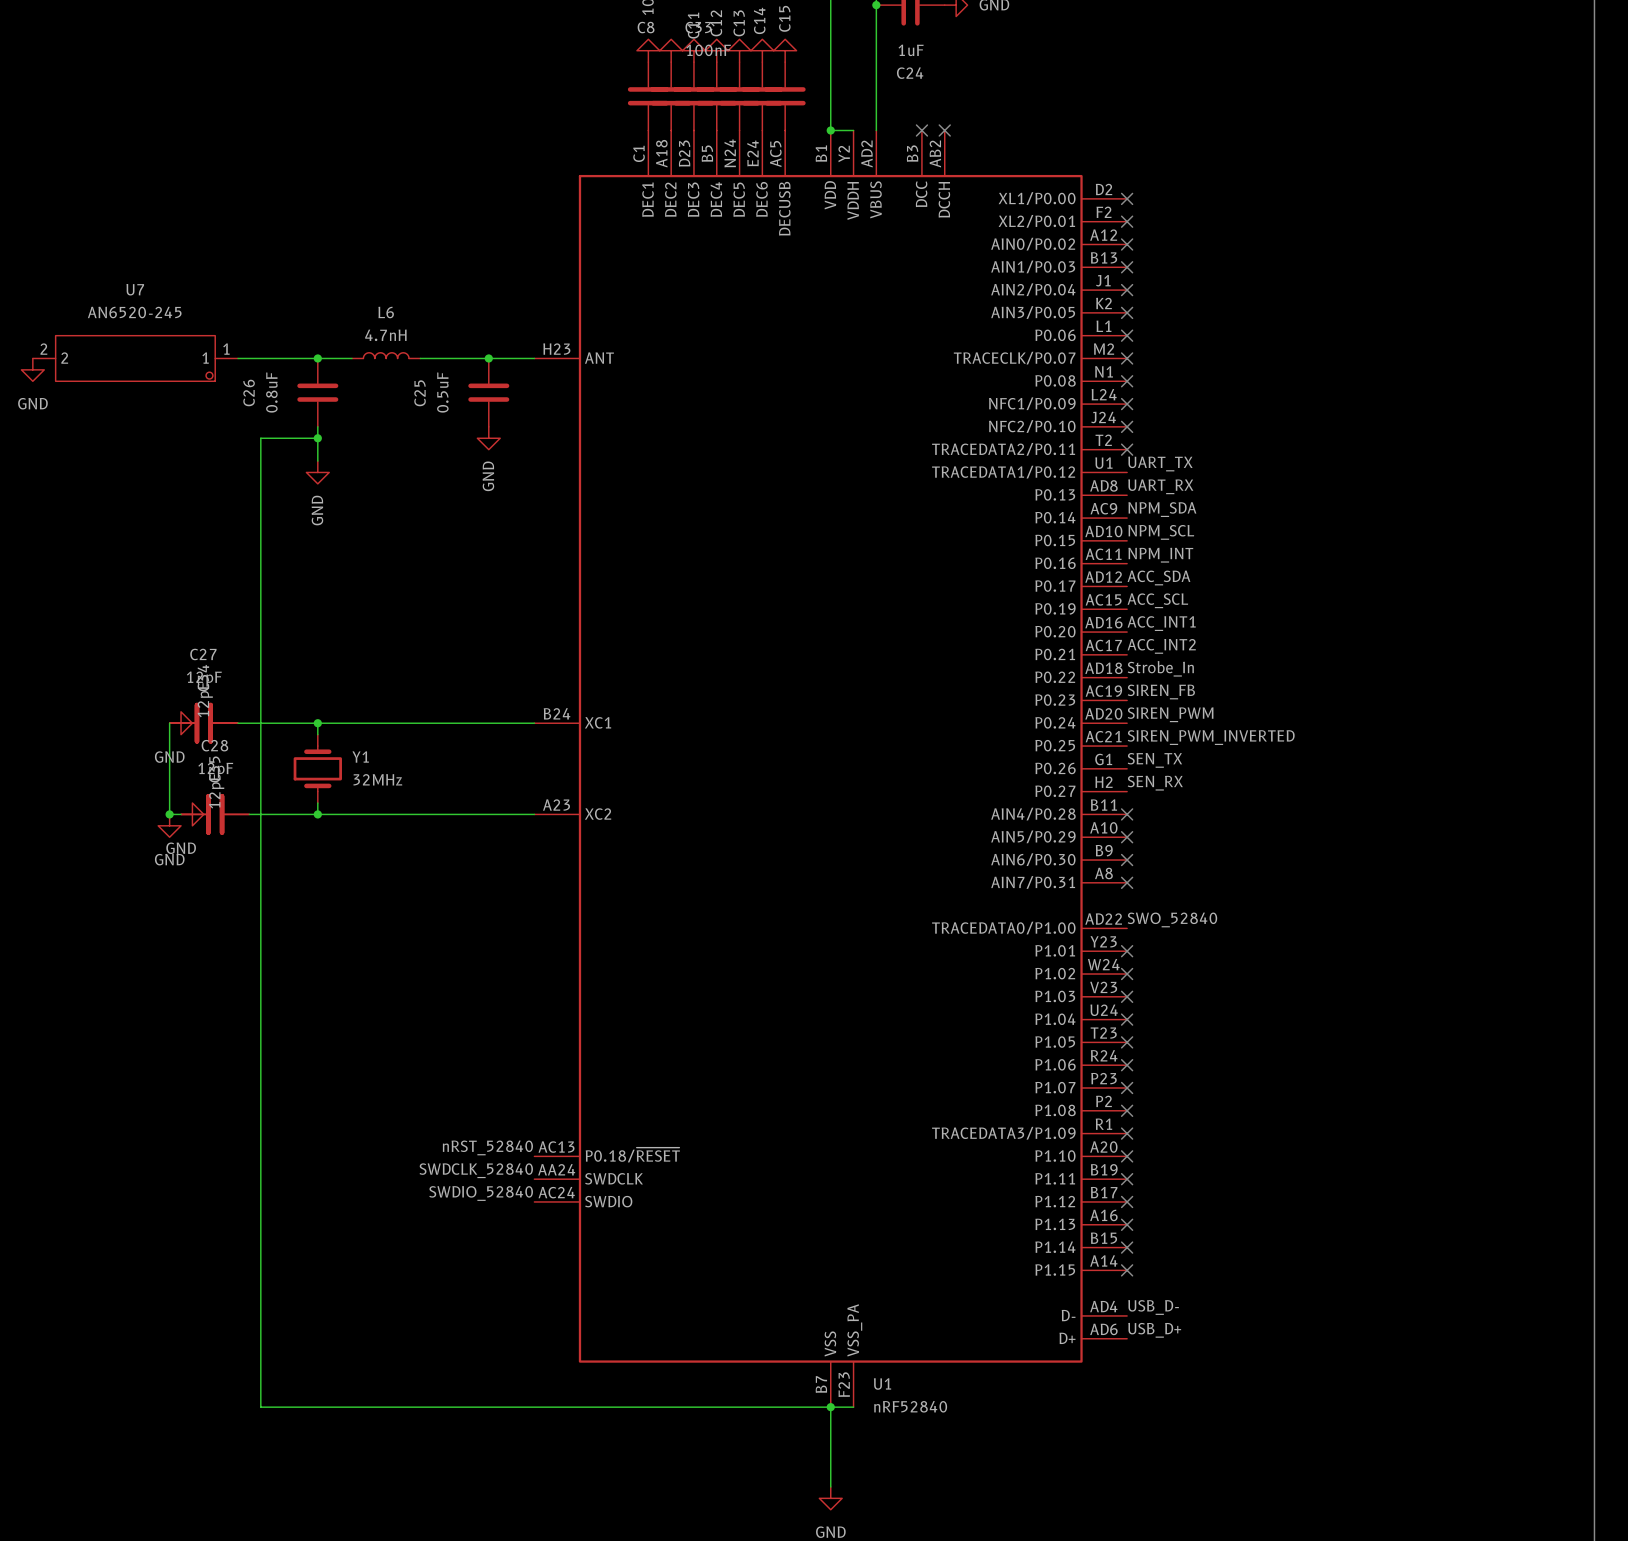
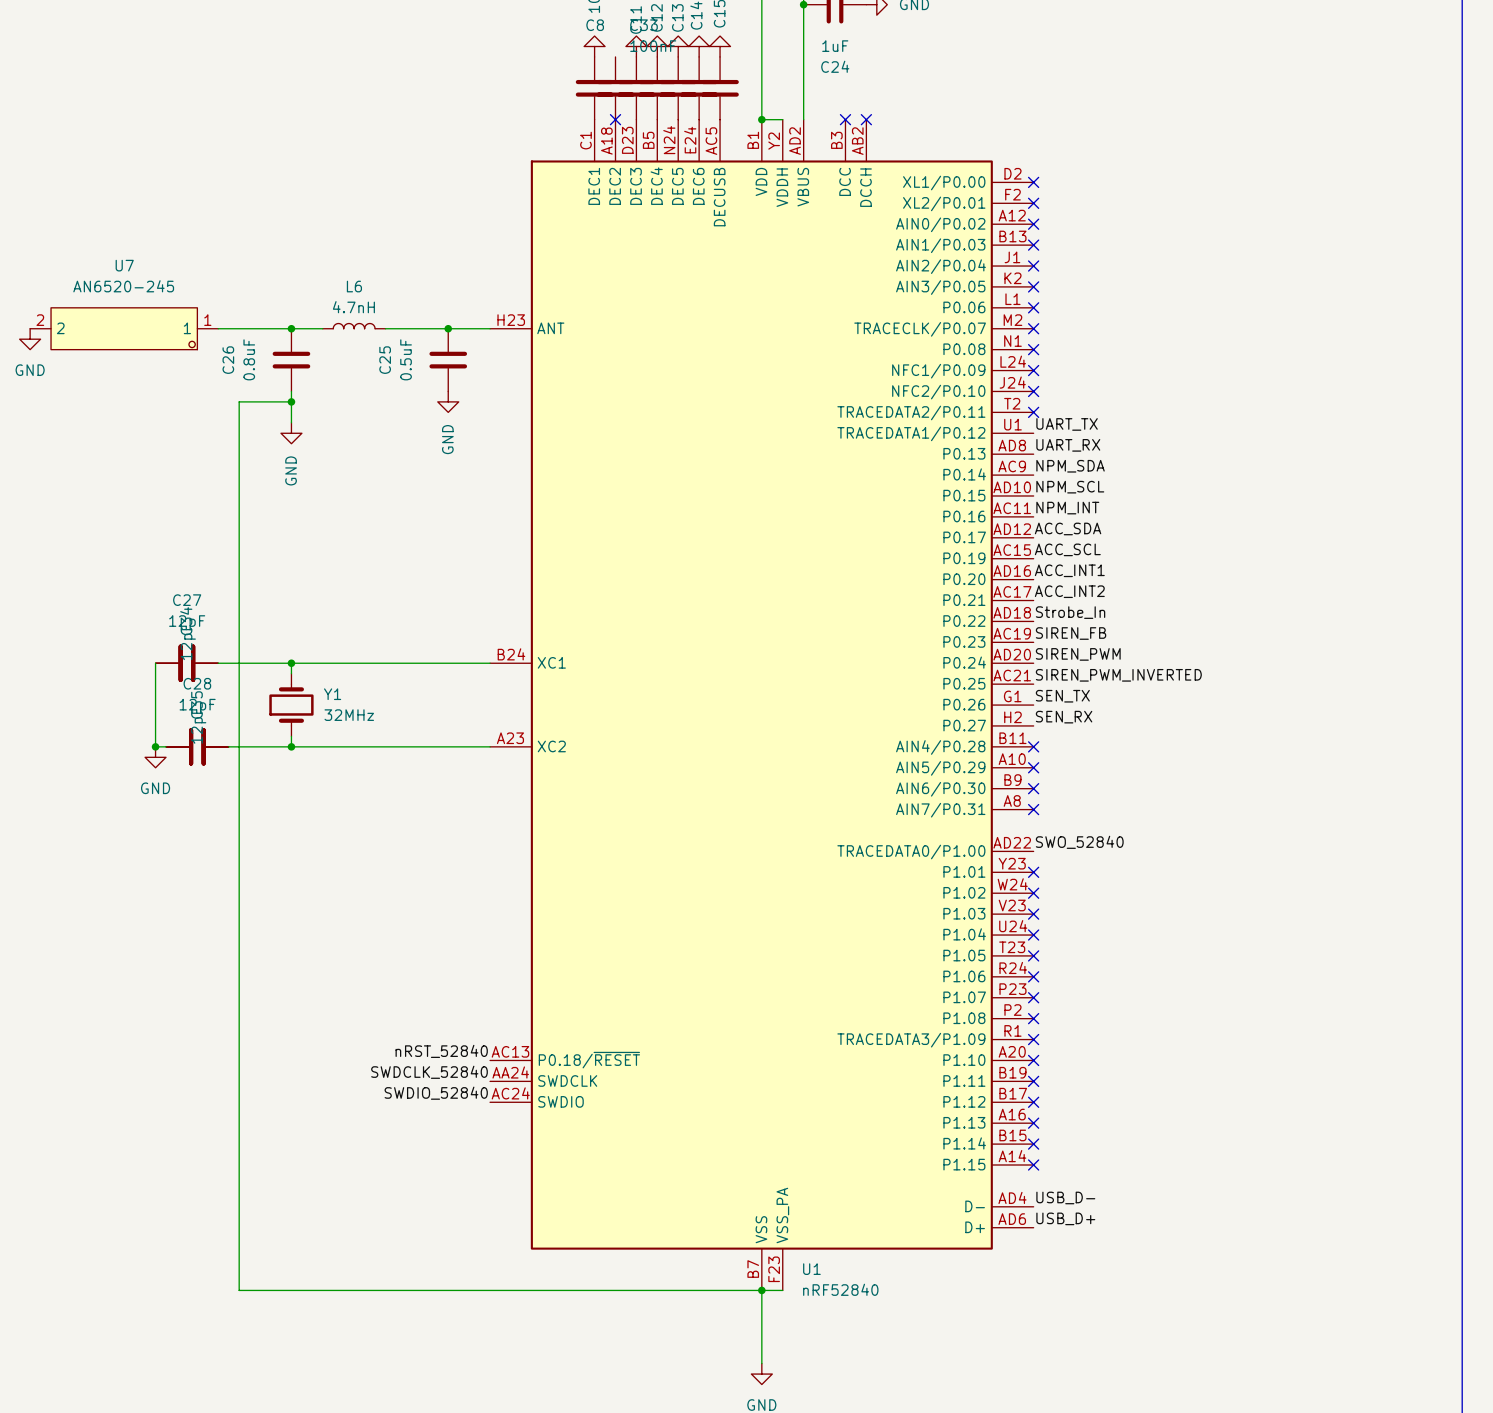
power symbol: (671, 50) -> none
no-connect mark: none -> (615, 119)
power symbol: GND (181, 723) -> none
power symbol: GND (192, 814) -> none

